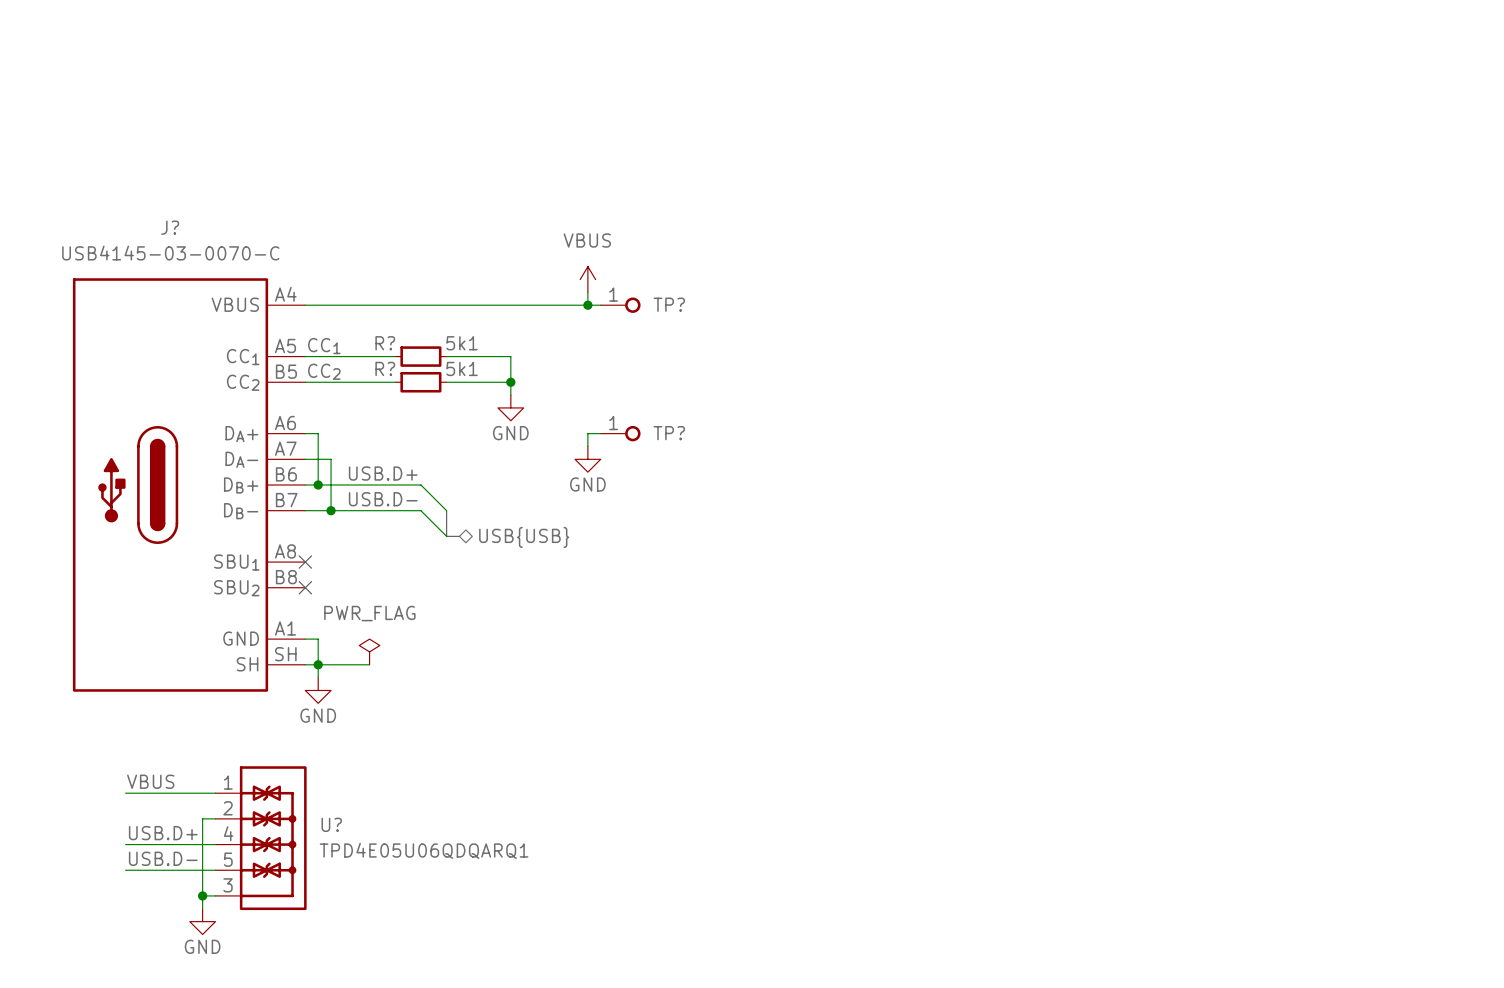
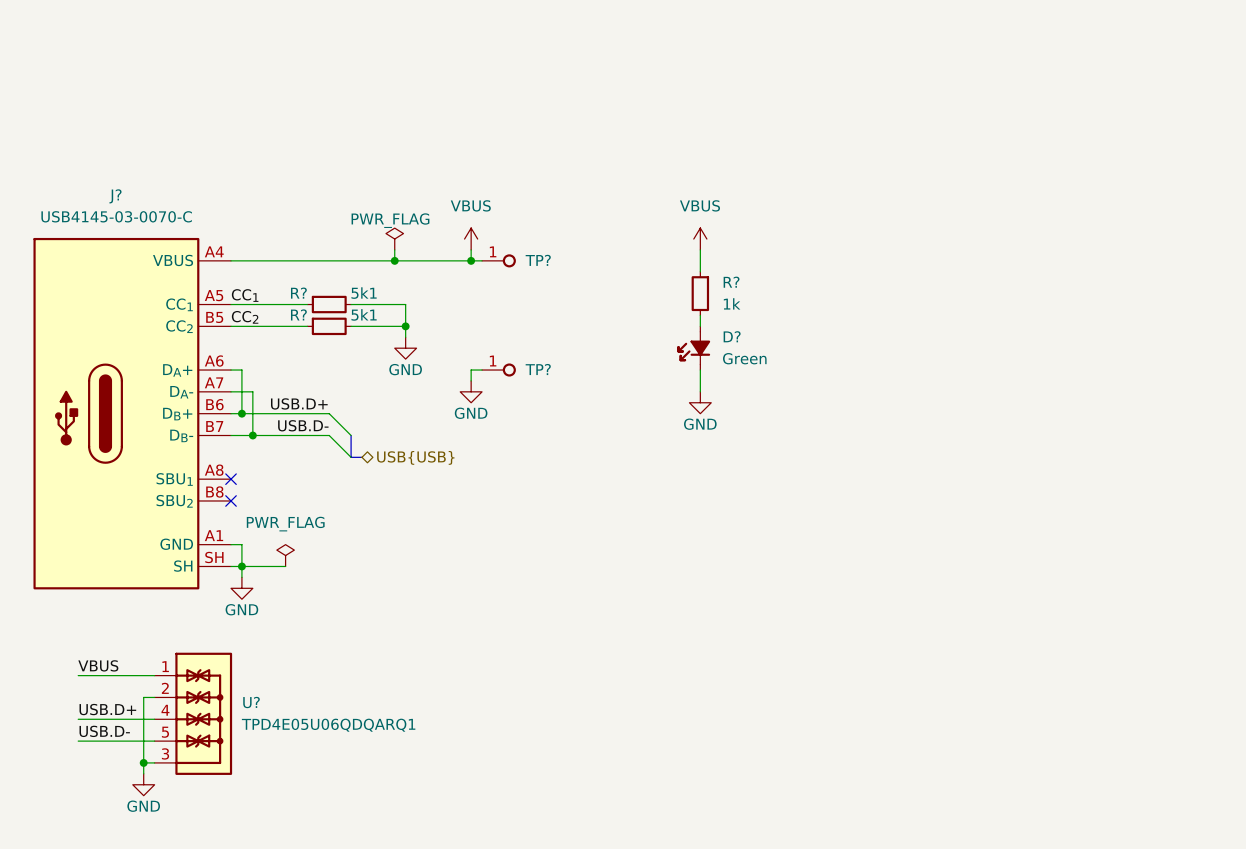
power symbol: none -> PWR_FLAG (394, 239)
power symbol: none -> VBUS (700, 239)
wire: none -> (394, 249) (394, 260)
wire: none -> (700, 249) (700, 271)
junction: none -> (394, 260)
R?: none -> (700, 293)
wire: none -> (700, 315) (700, 326)
D?: none -> (693, 348)
wire: none -> (700, 370) (700, 391)
power symbol: none -> GND (700, 402)

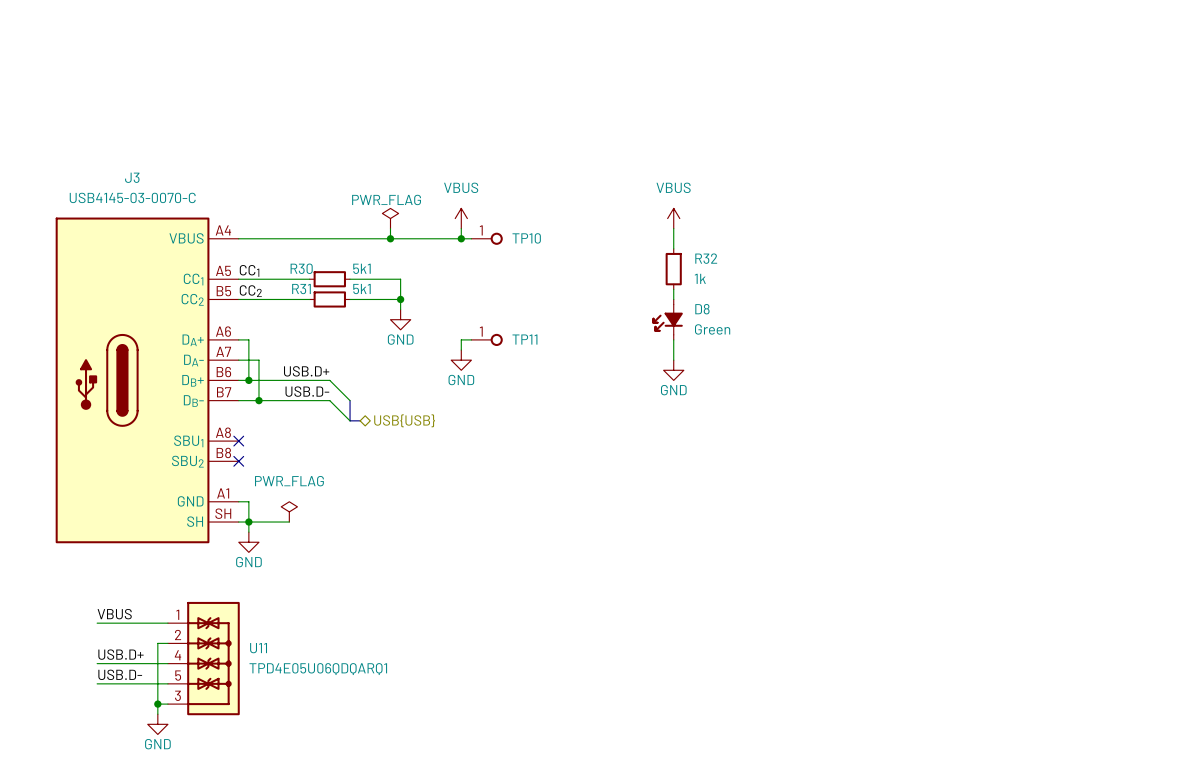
J? name: J? (115, 196) -> J3 (132, 177)
TP? name: TP? (538, 260) -> TP10 (526, 238)
R? name: R? (731, 282) -> R32 (706, 258)
R? name: R? (298, 293) -> R30 (301, 268)
R? name: R? (298, 314) -> R31 (301, 289)
D? name: D? (732, 336) -> D8 (702, 309)
TP? name: TP? (538, 369) -> TP11 (524, 339)
U? name: U? (251, 702) -> U11 (258, 648)

